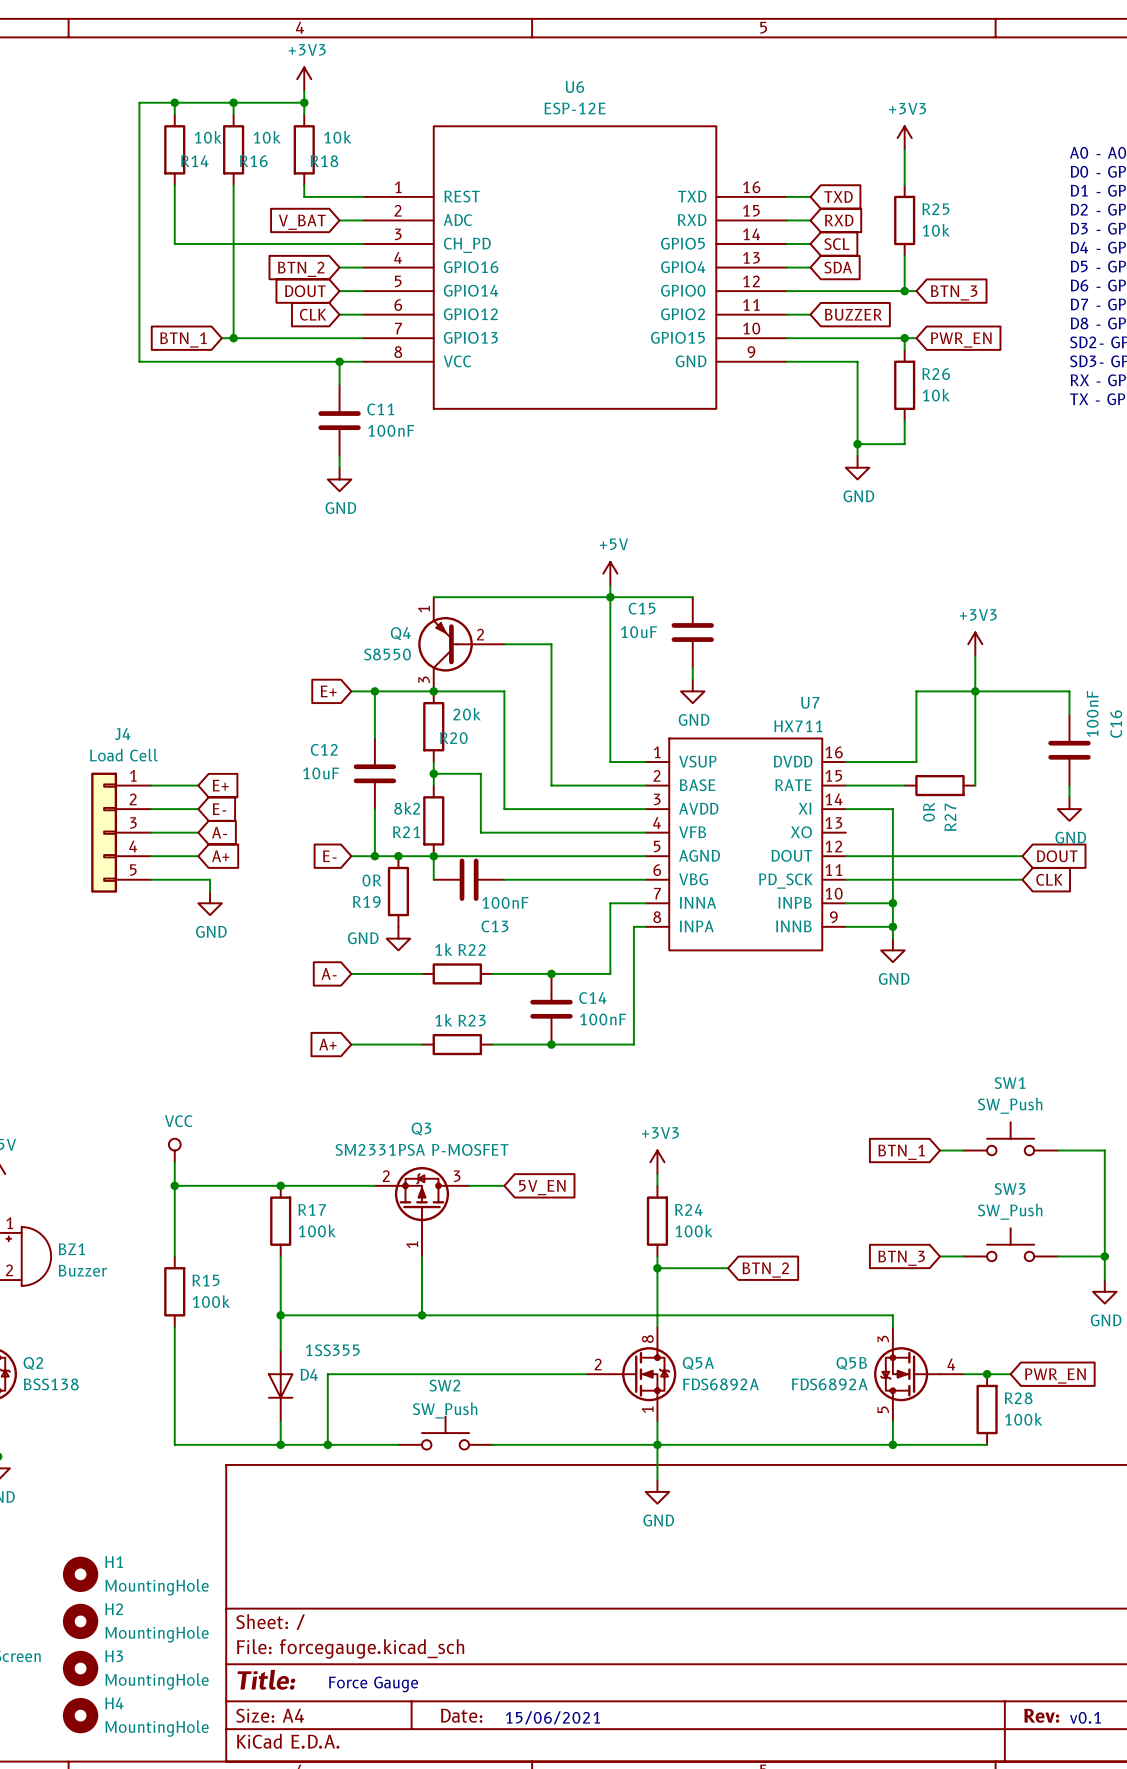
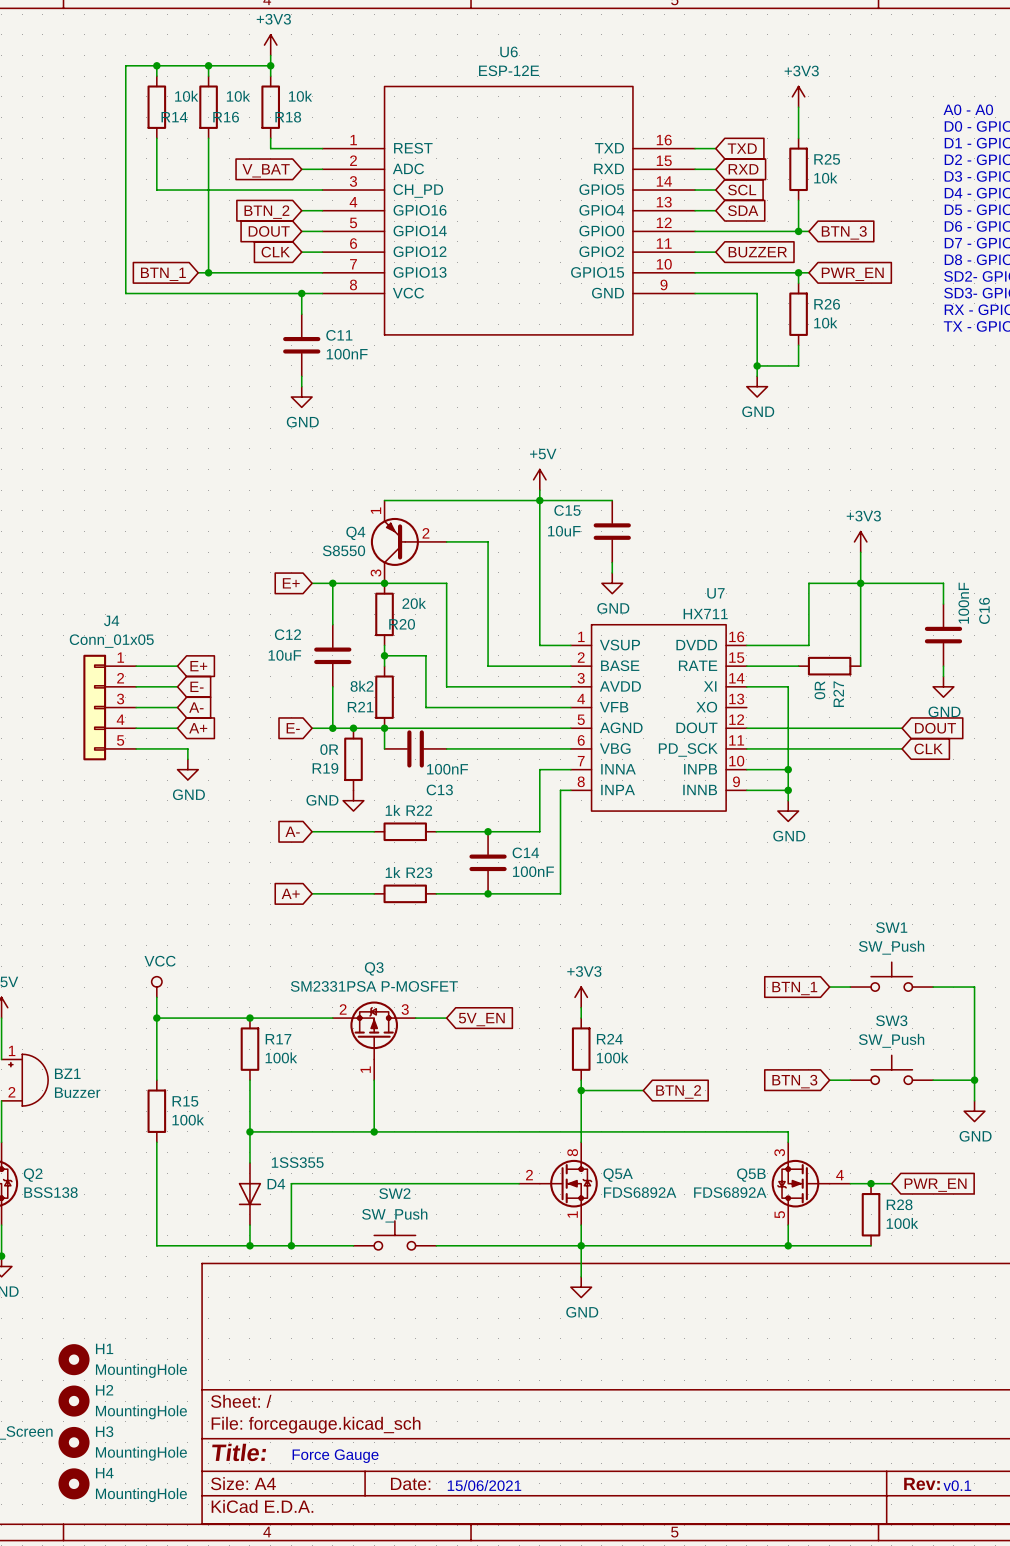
J4 value: Load Cell (123, 755) -> Conn_01x05 (111, 641)

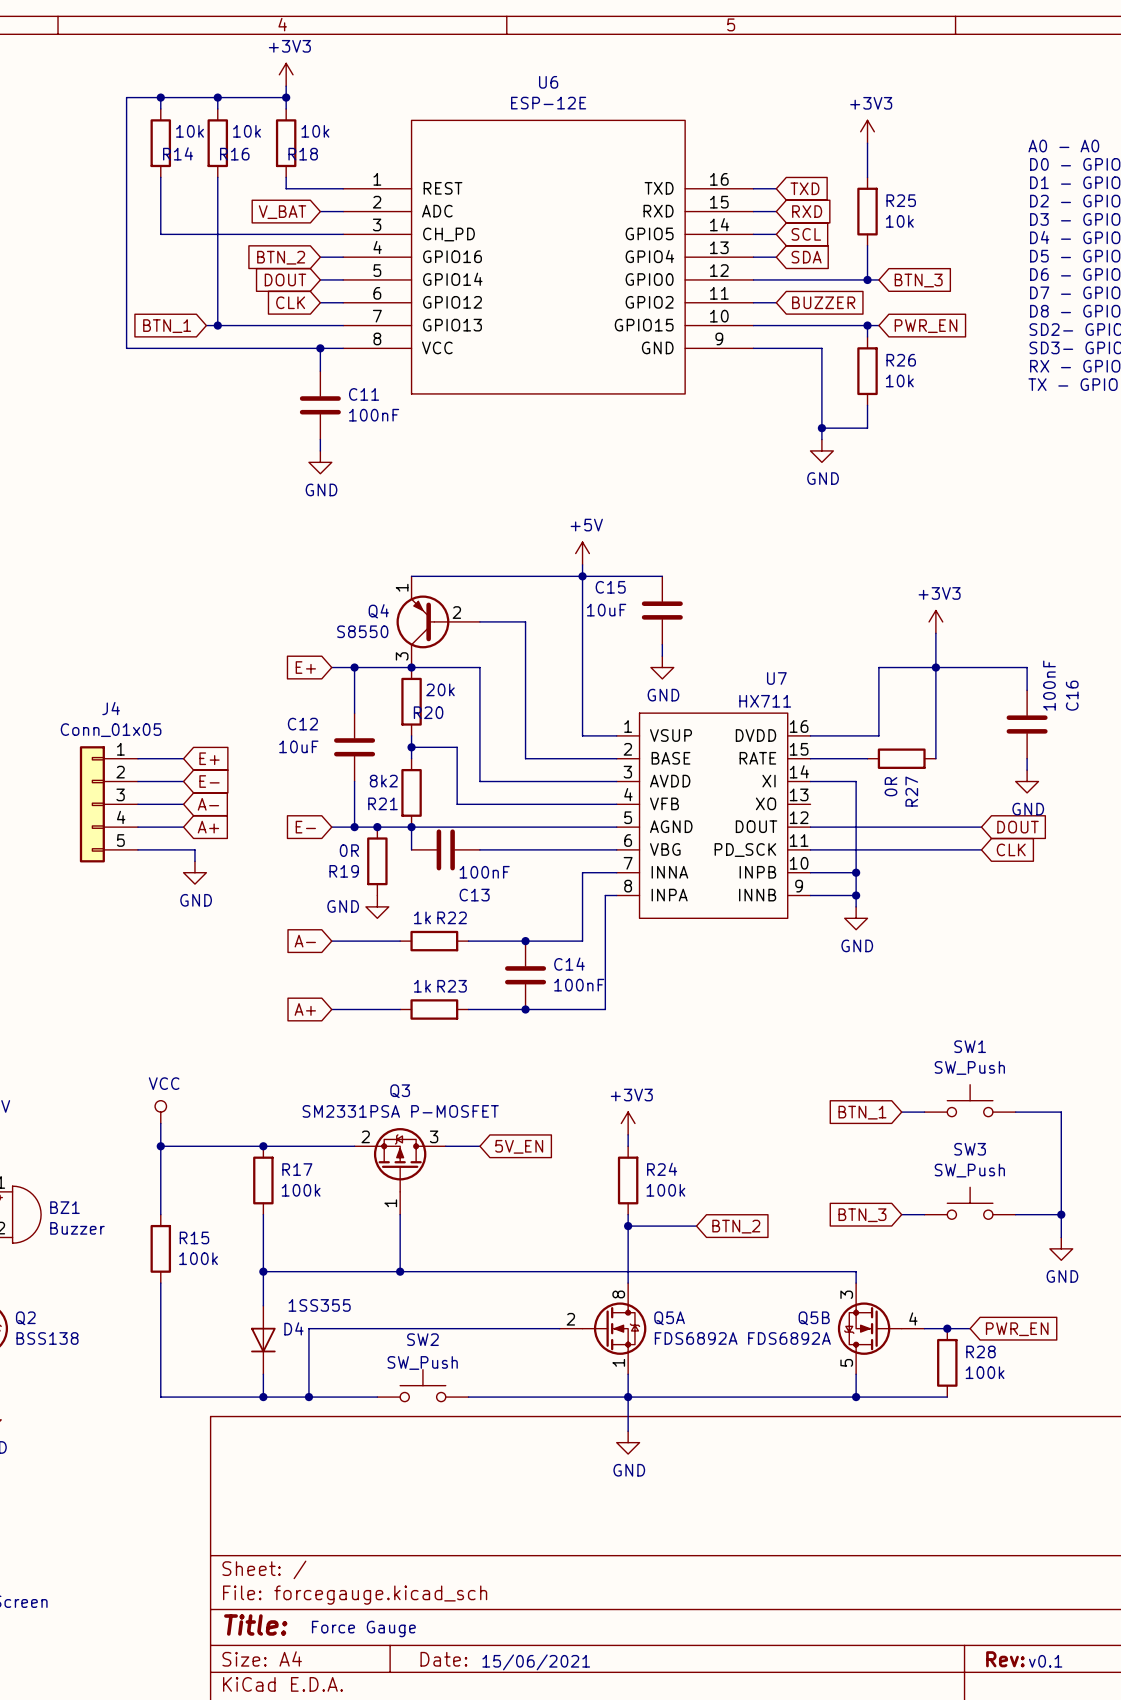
H1: MountingHole (74, 1359) -> none
H2: MountingHole (74, 1401) -> none
H3: MountingHole (74, 1442) -> none
H4: MountingHole (74, 1483) -> none

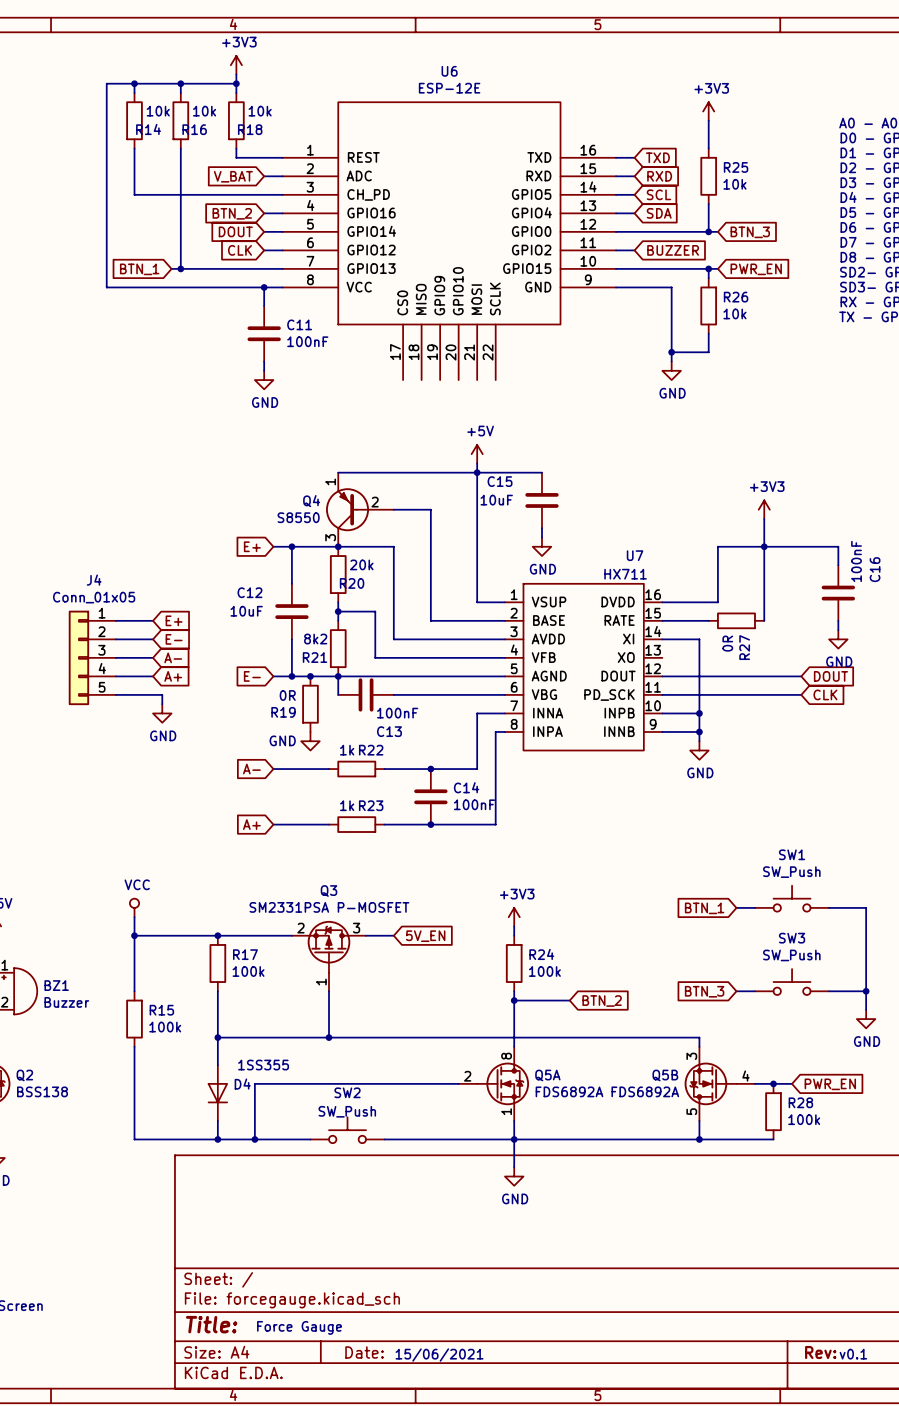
U6 symbol: [343, 120, 754, 394] -> [282, 102, 617, 381]

